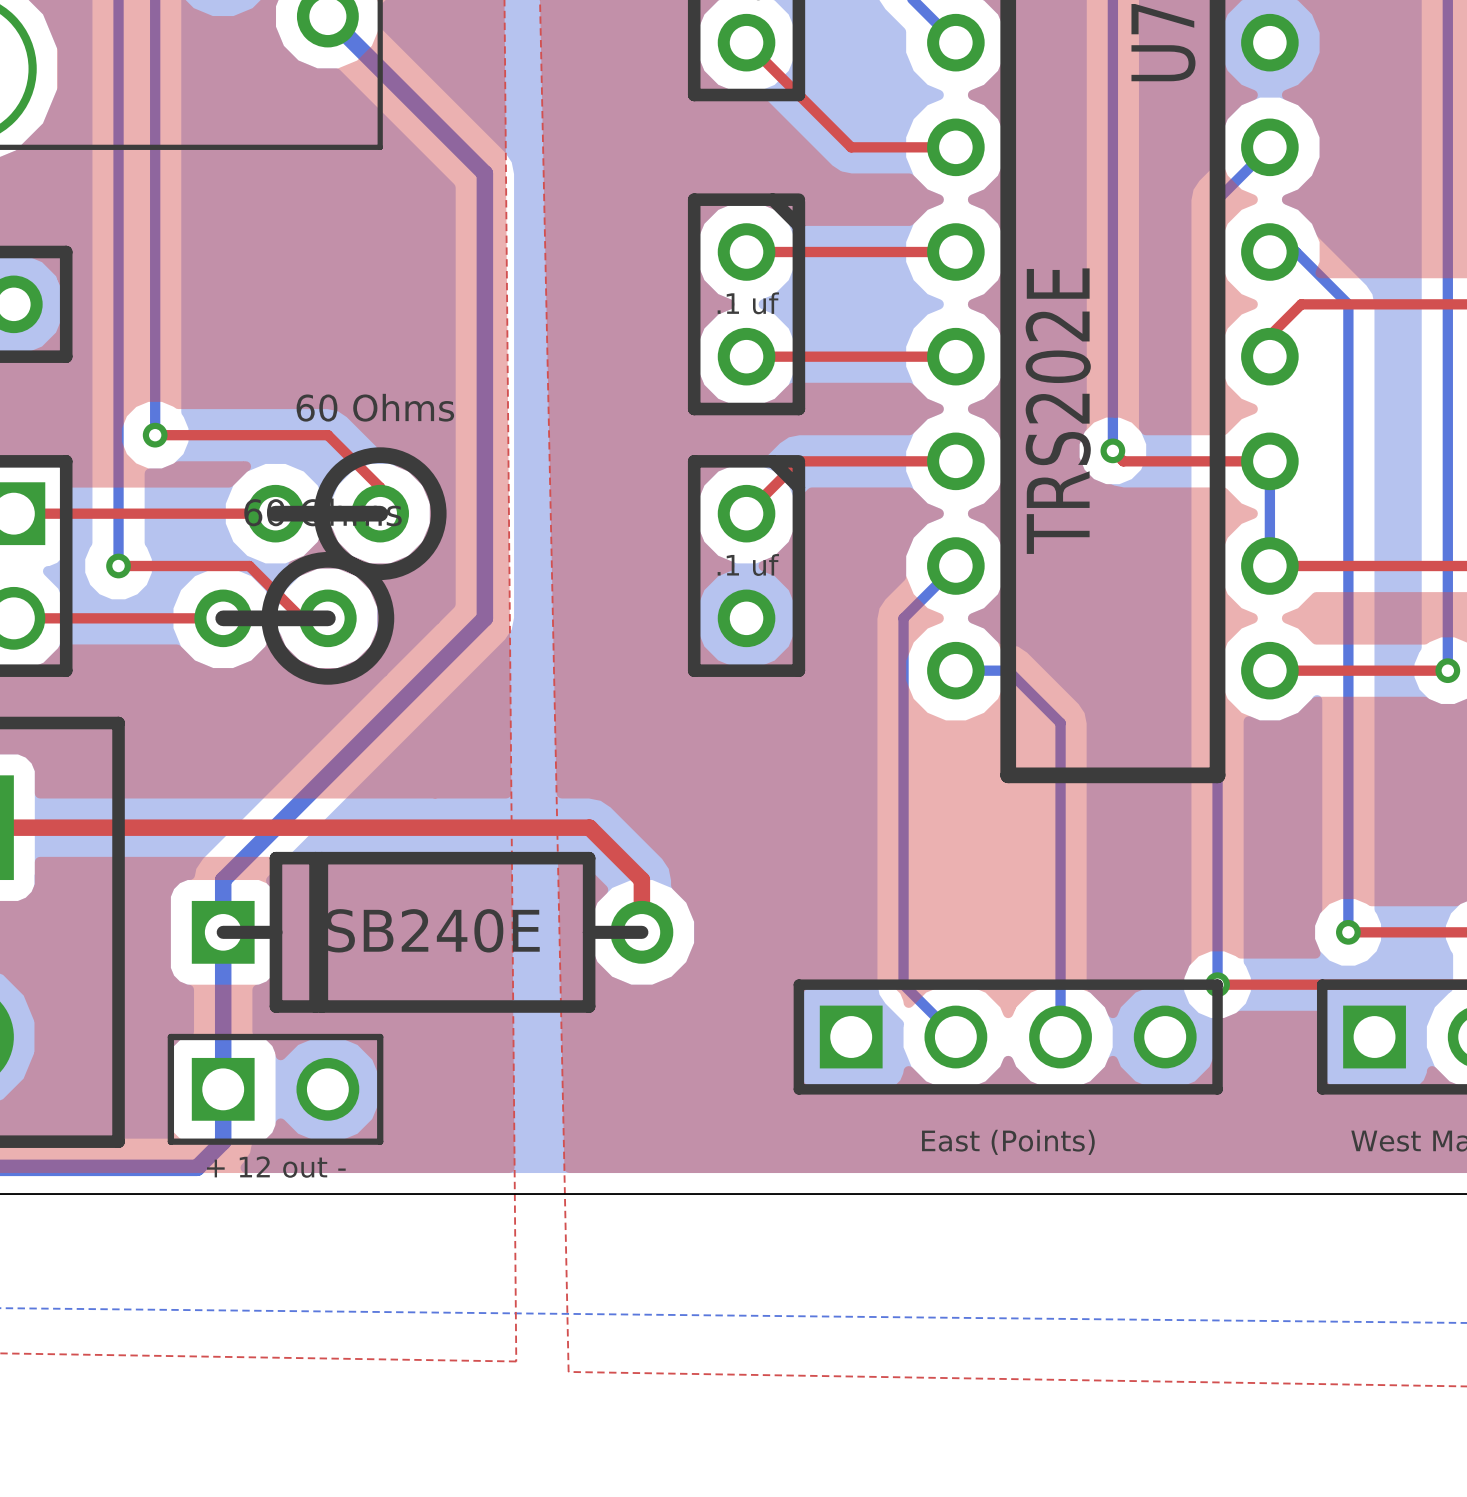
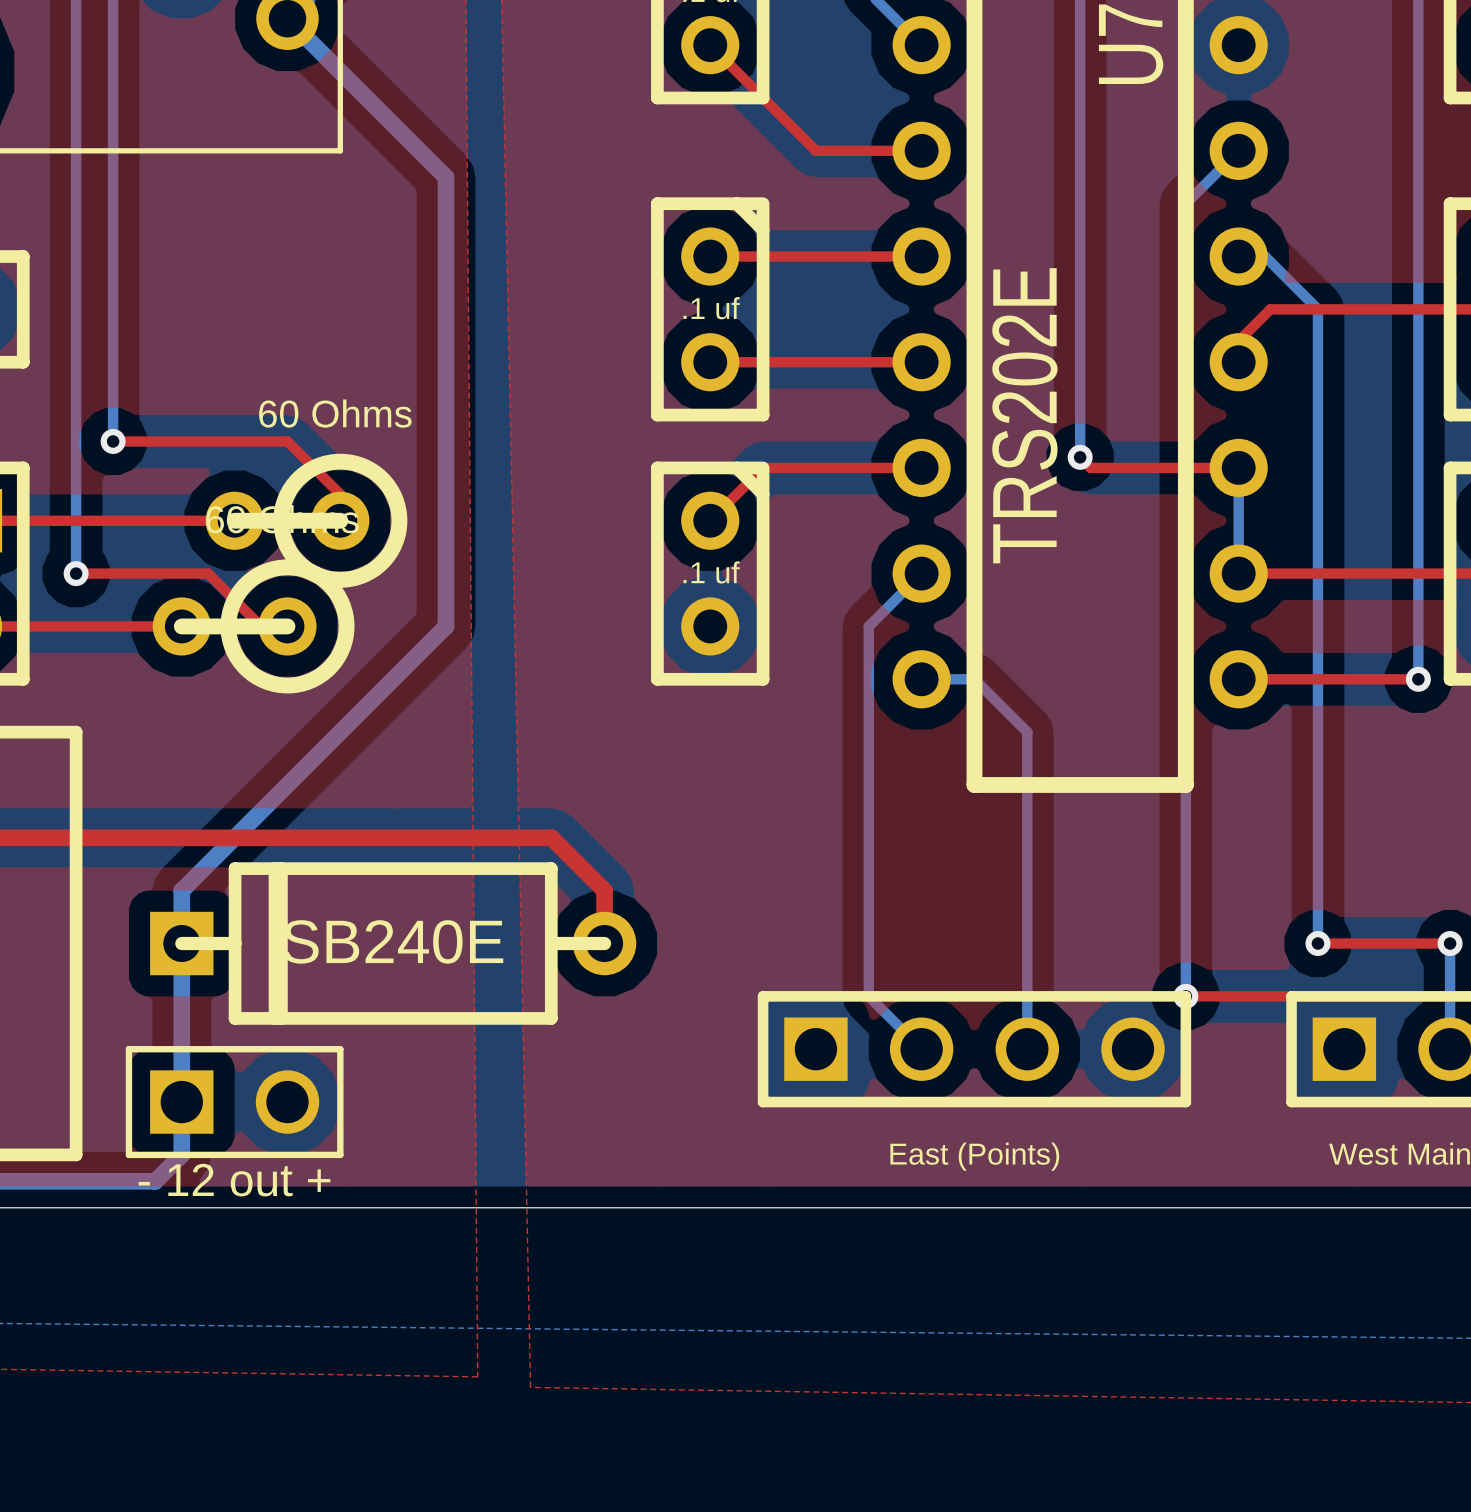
part value: + 12 out - (276, 1167) -> - 12 out + (234, 1180)

